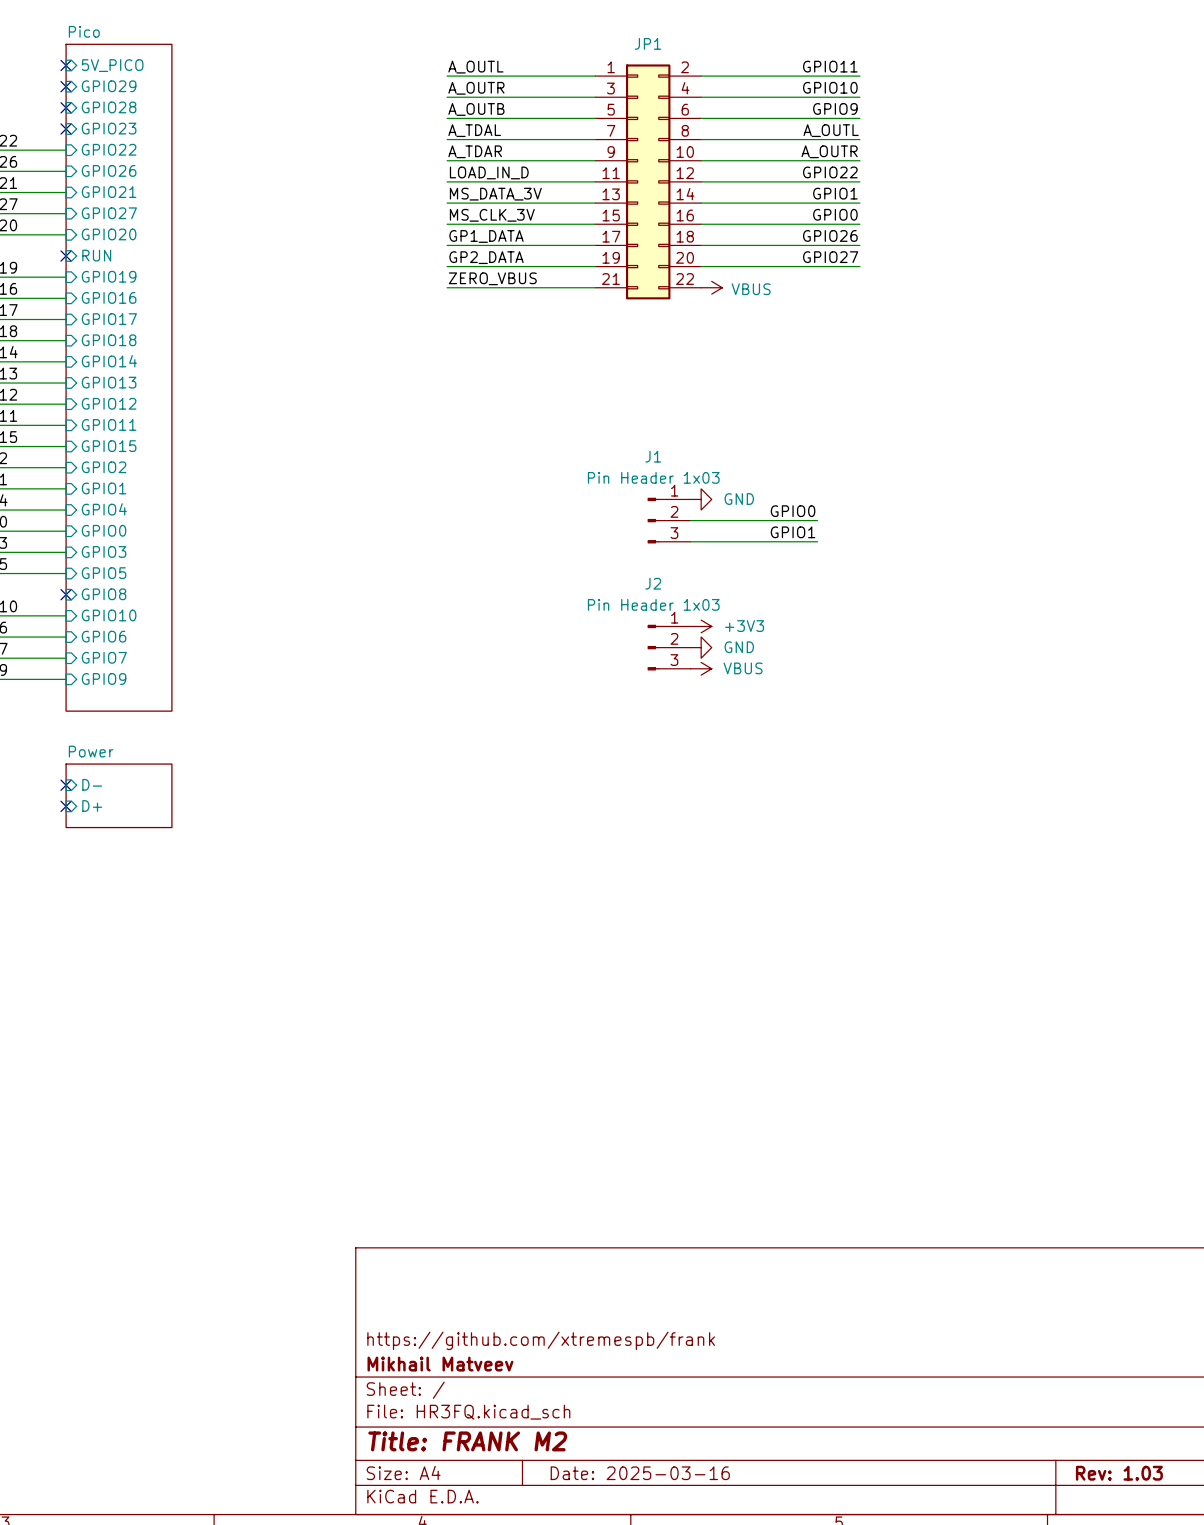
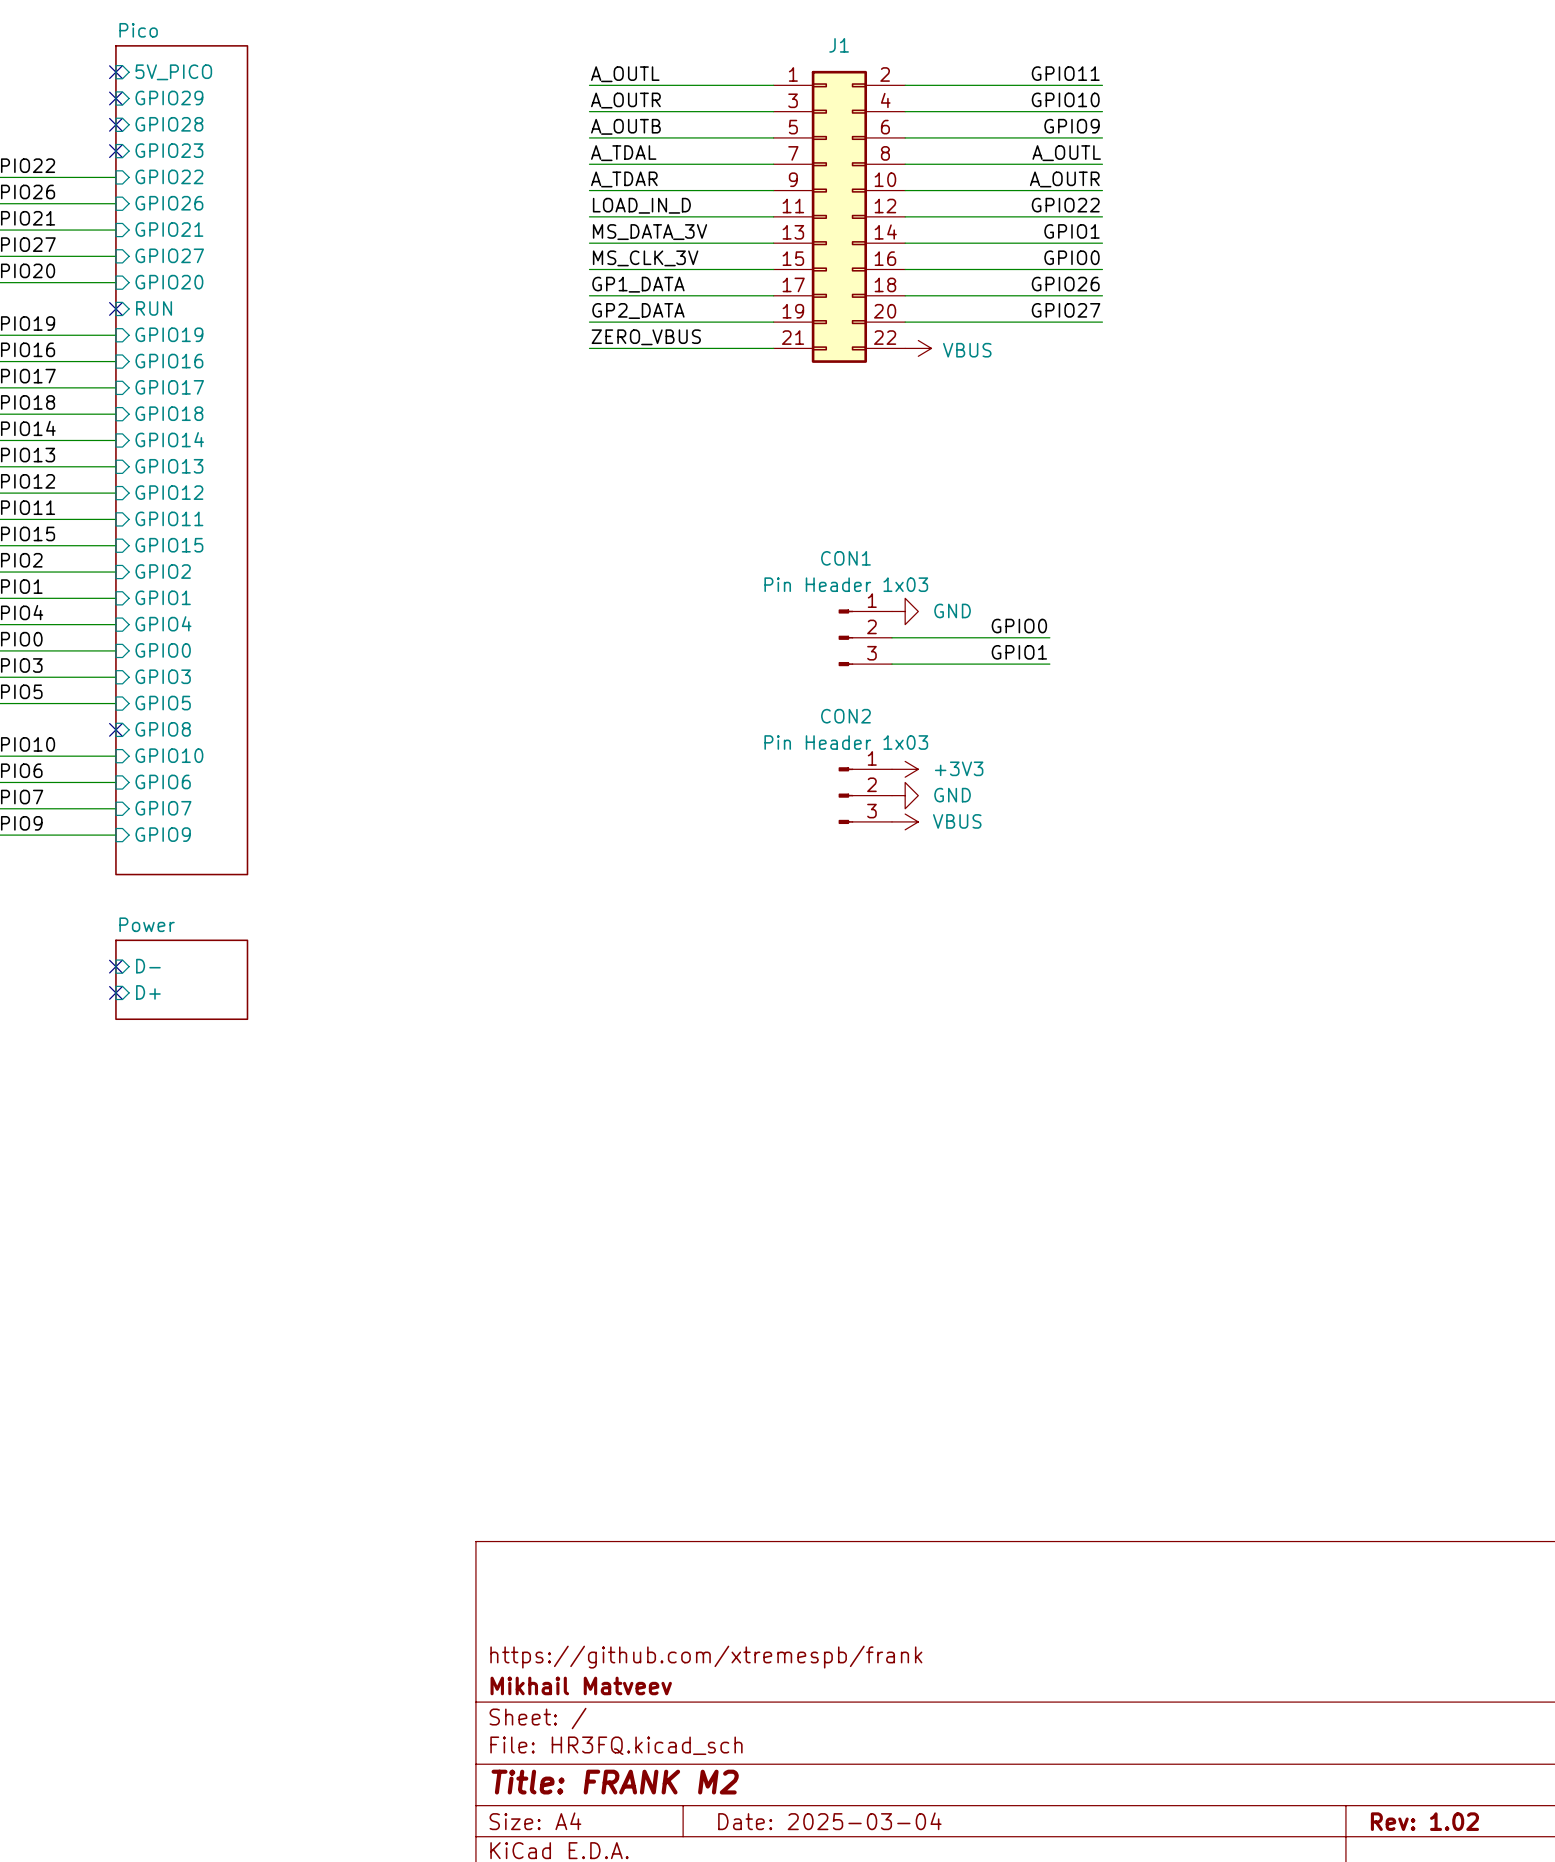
JP1 name: JP1 (647, 43) -> J1 (839, 45)
J1 name: J1 (653, 456) -> CON1 (845, 558)
J2 name: J2 (653, 583) -> CON2 (845, 716)
title block: Date: 2025-03-16 (640, 1473) -> Date: 2025-03-04 (829, 1821)
title block: Rev: 1.03 (1119, 1473) -> Rev: 1.02 (1424, 1821)

